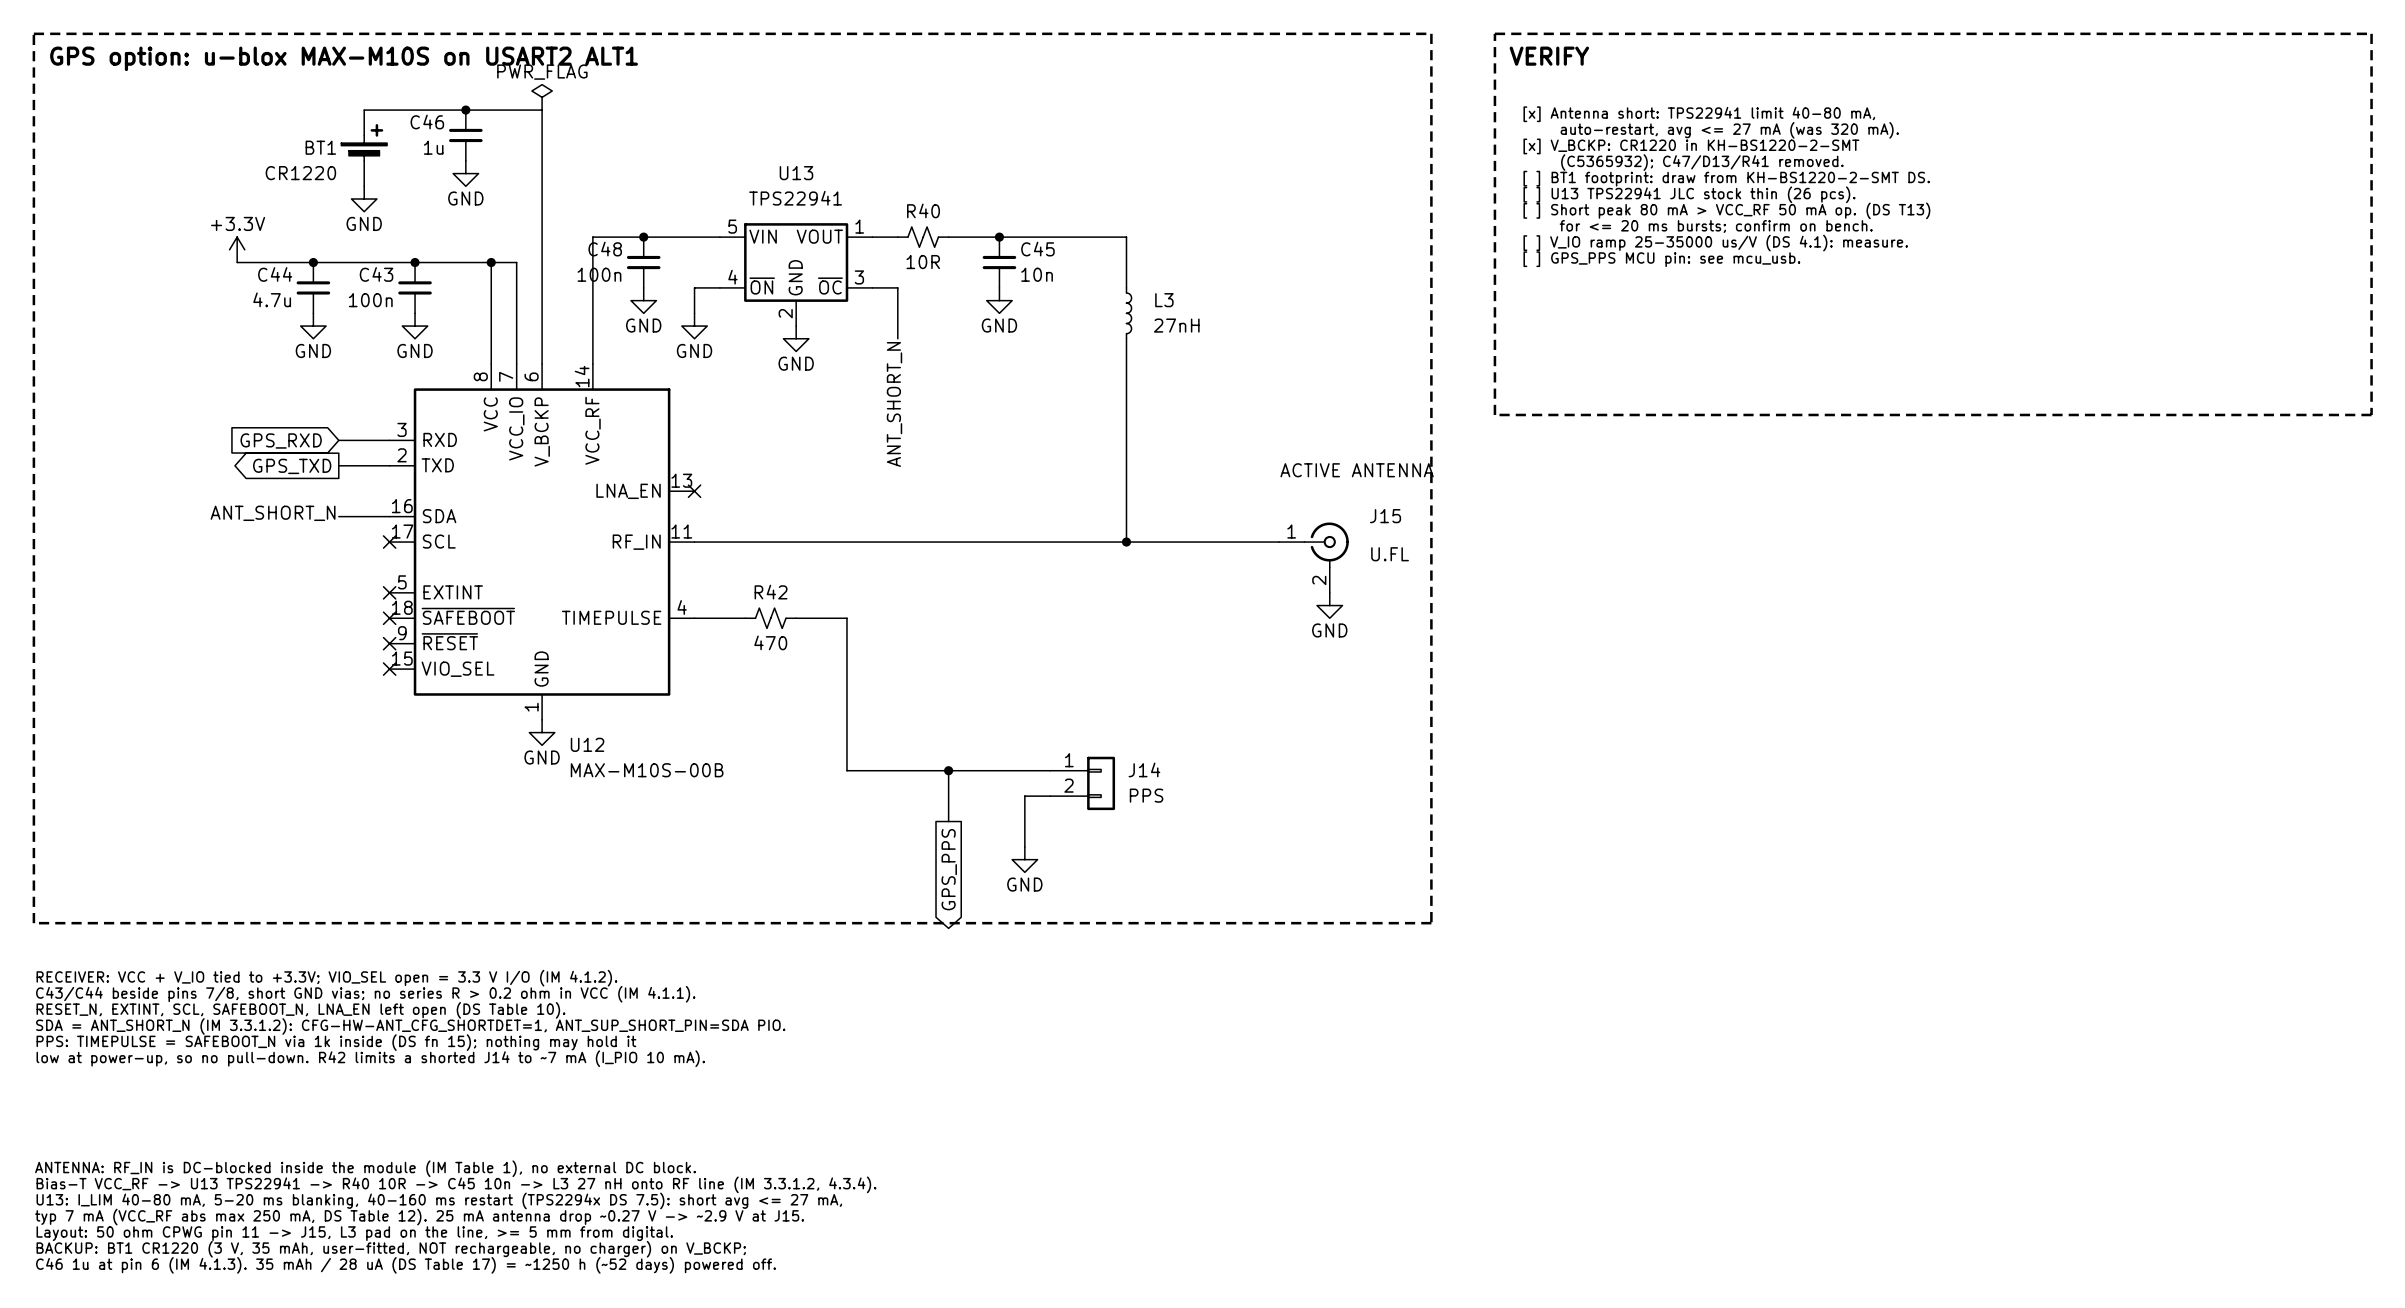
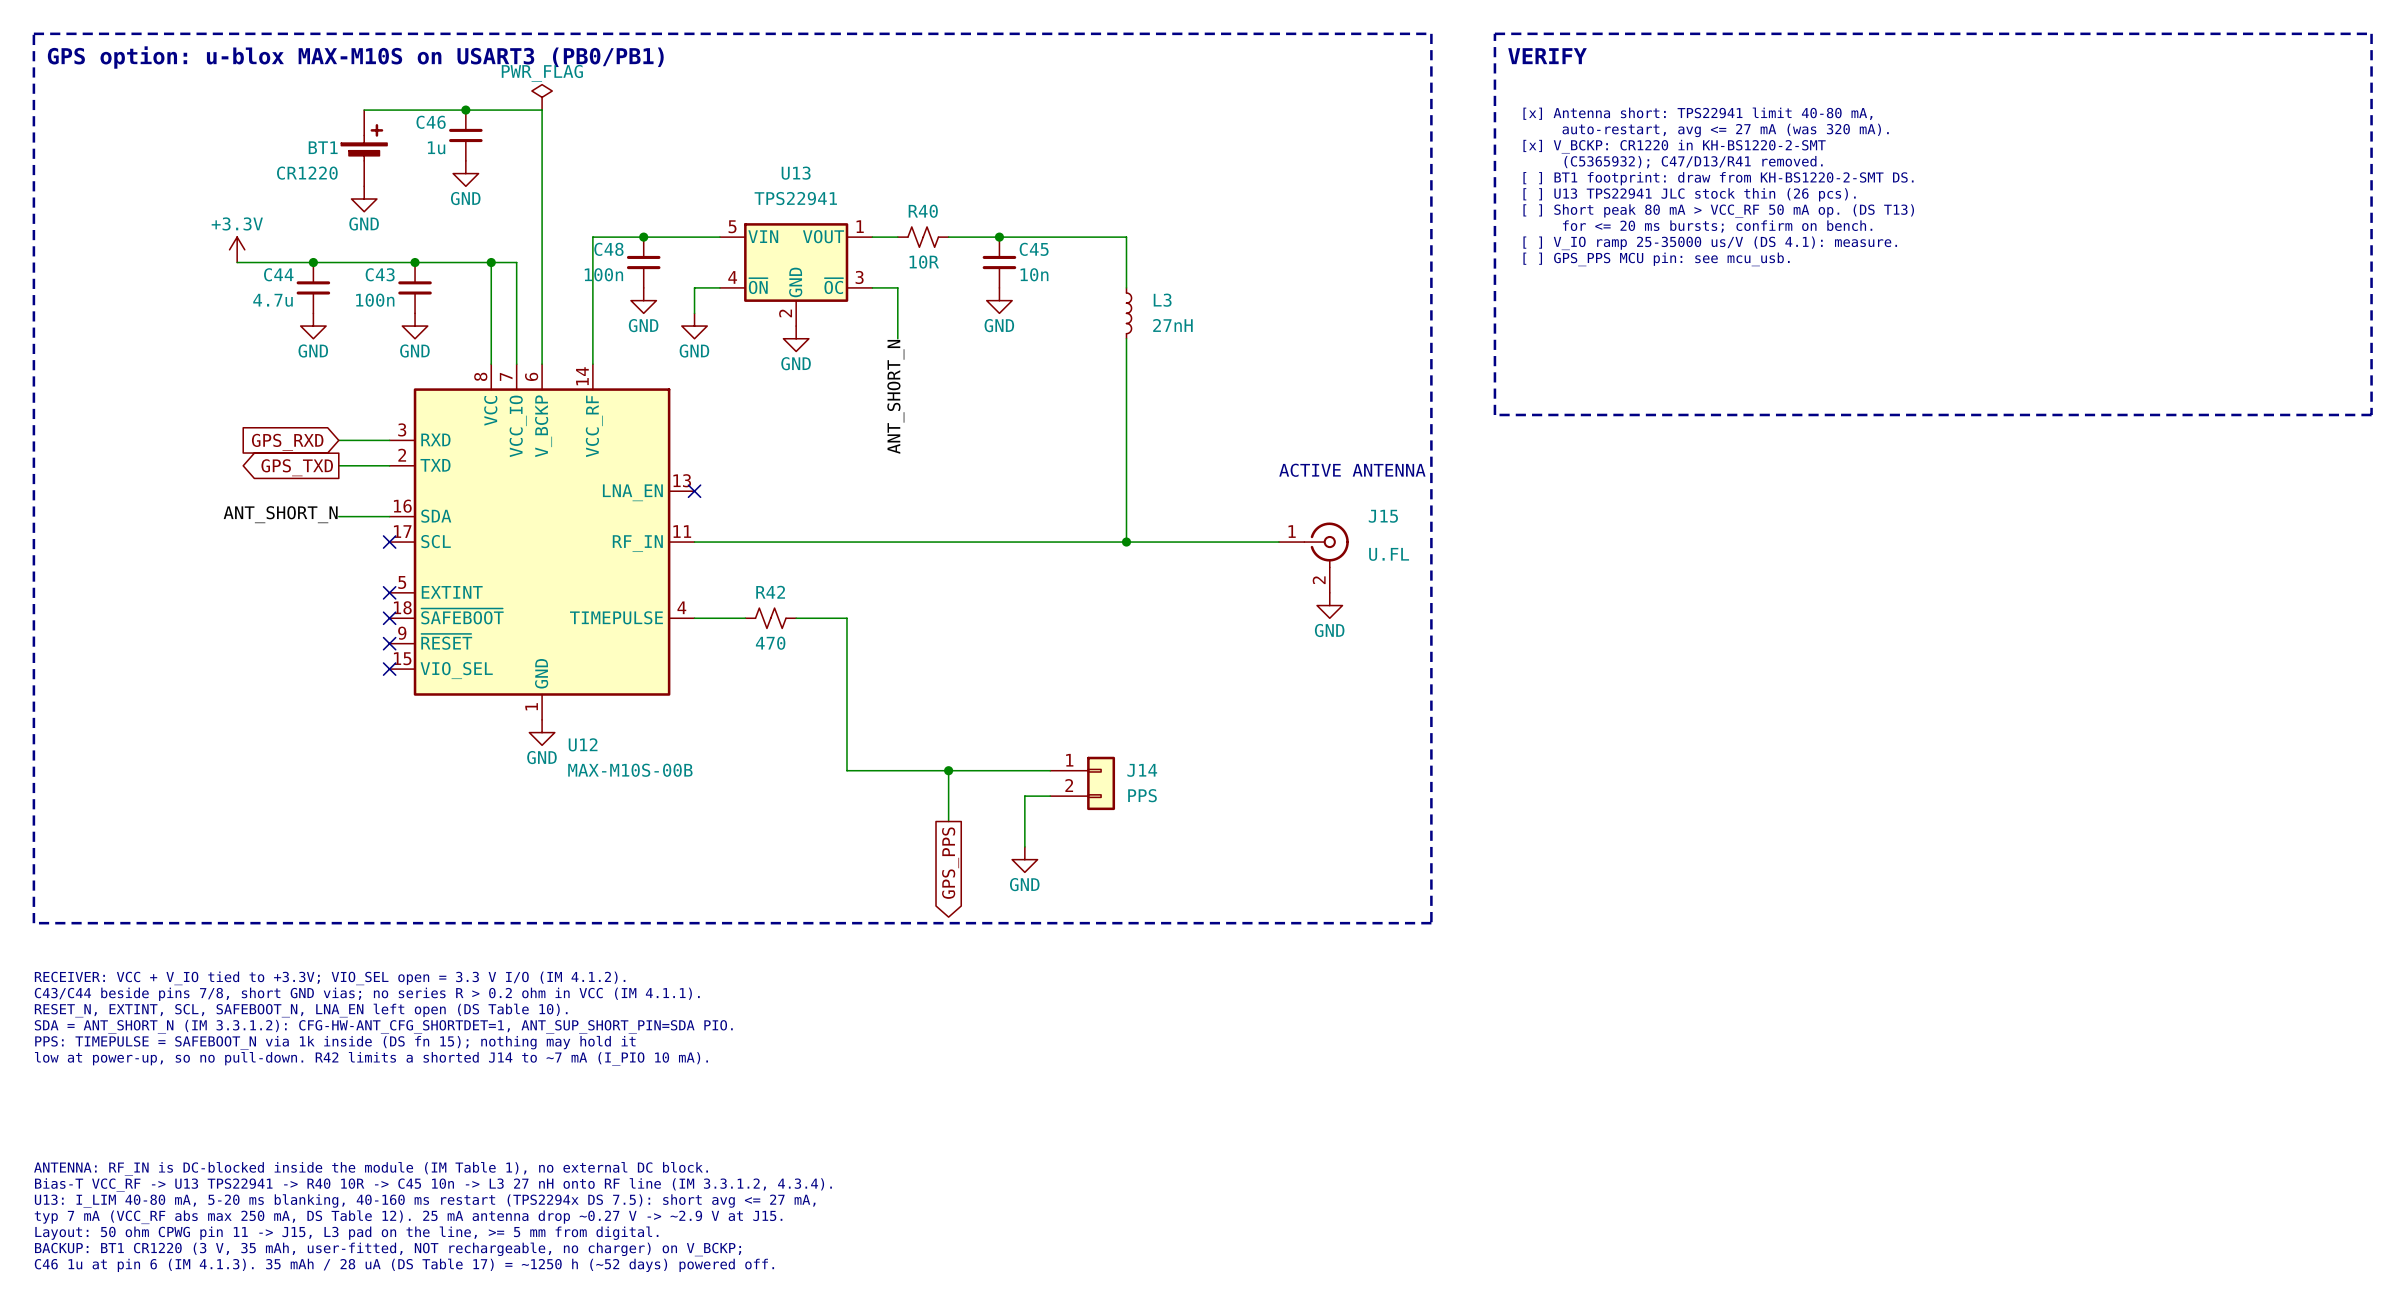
text: GPS option: u-blox MAX-M10S on USART2 ALT1 (344, 58) -> GPS option: u-blox MAX-M10S on USART3 (PB0/PB1) (355, 57)

